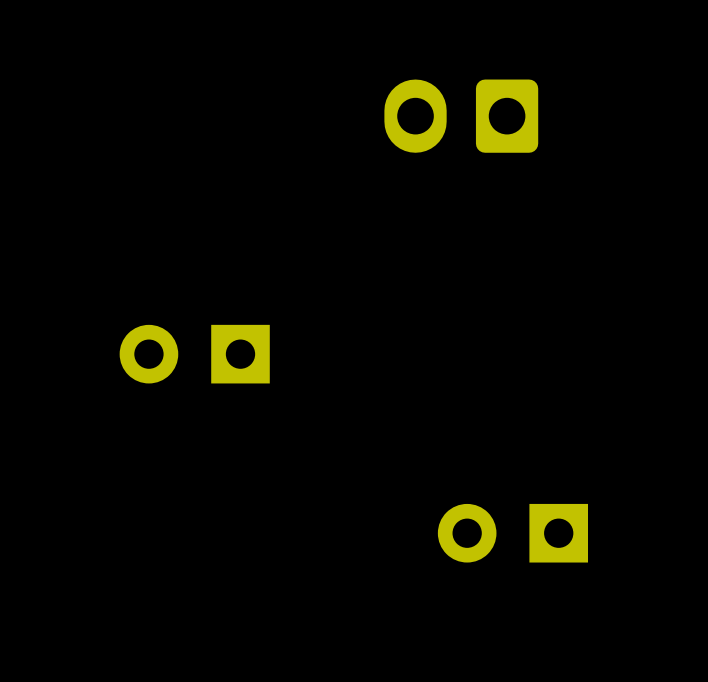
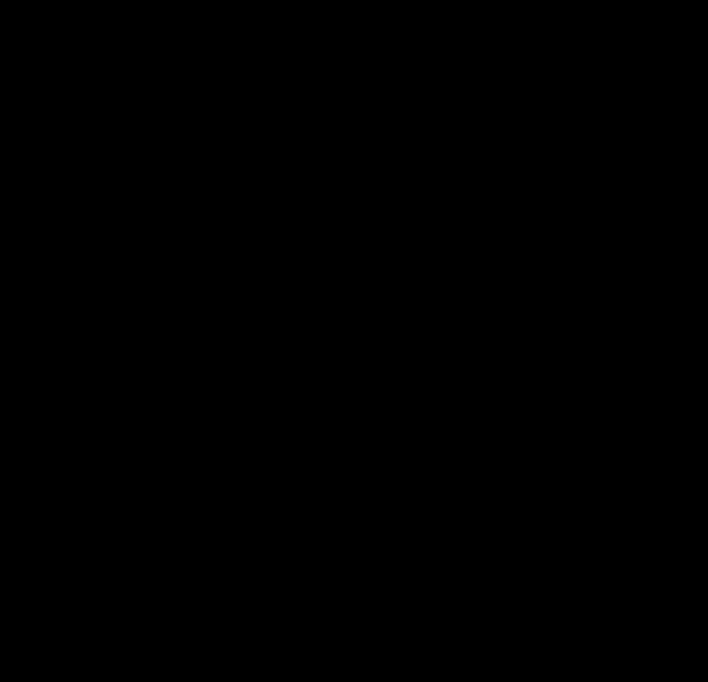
part: (461, 116) -> none
part: (194, 354) -> none
part: (512, 533) -> none

